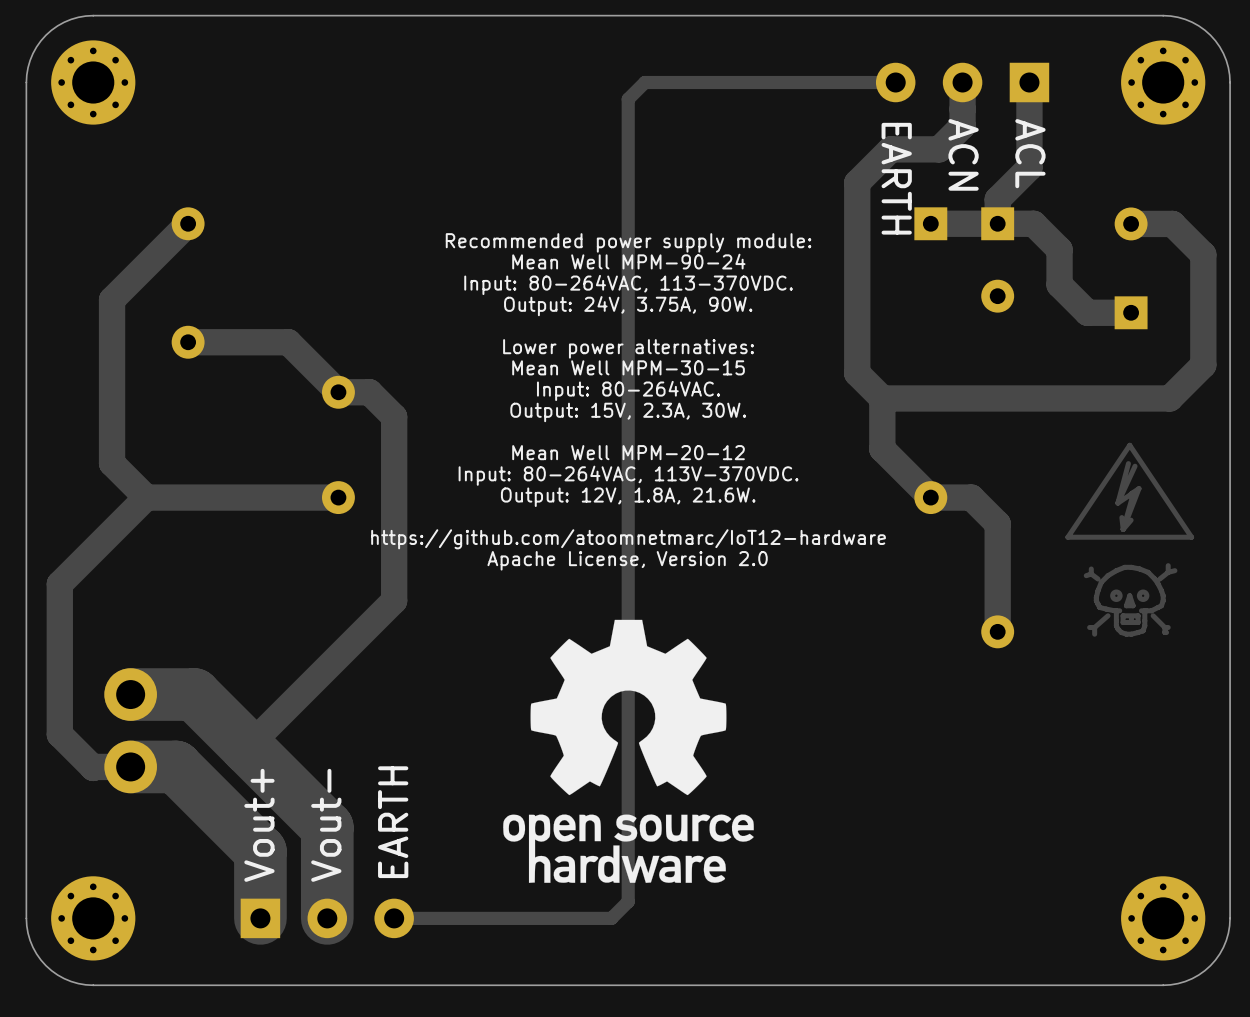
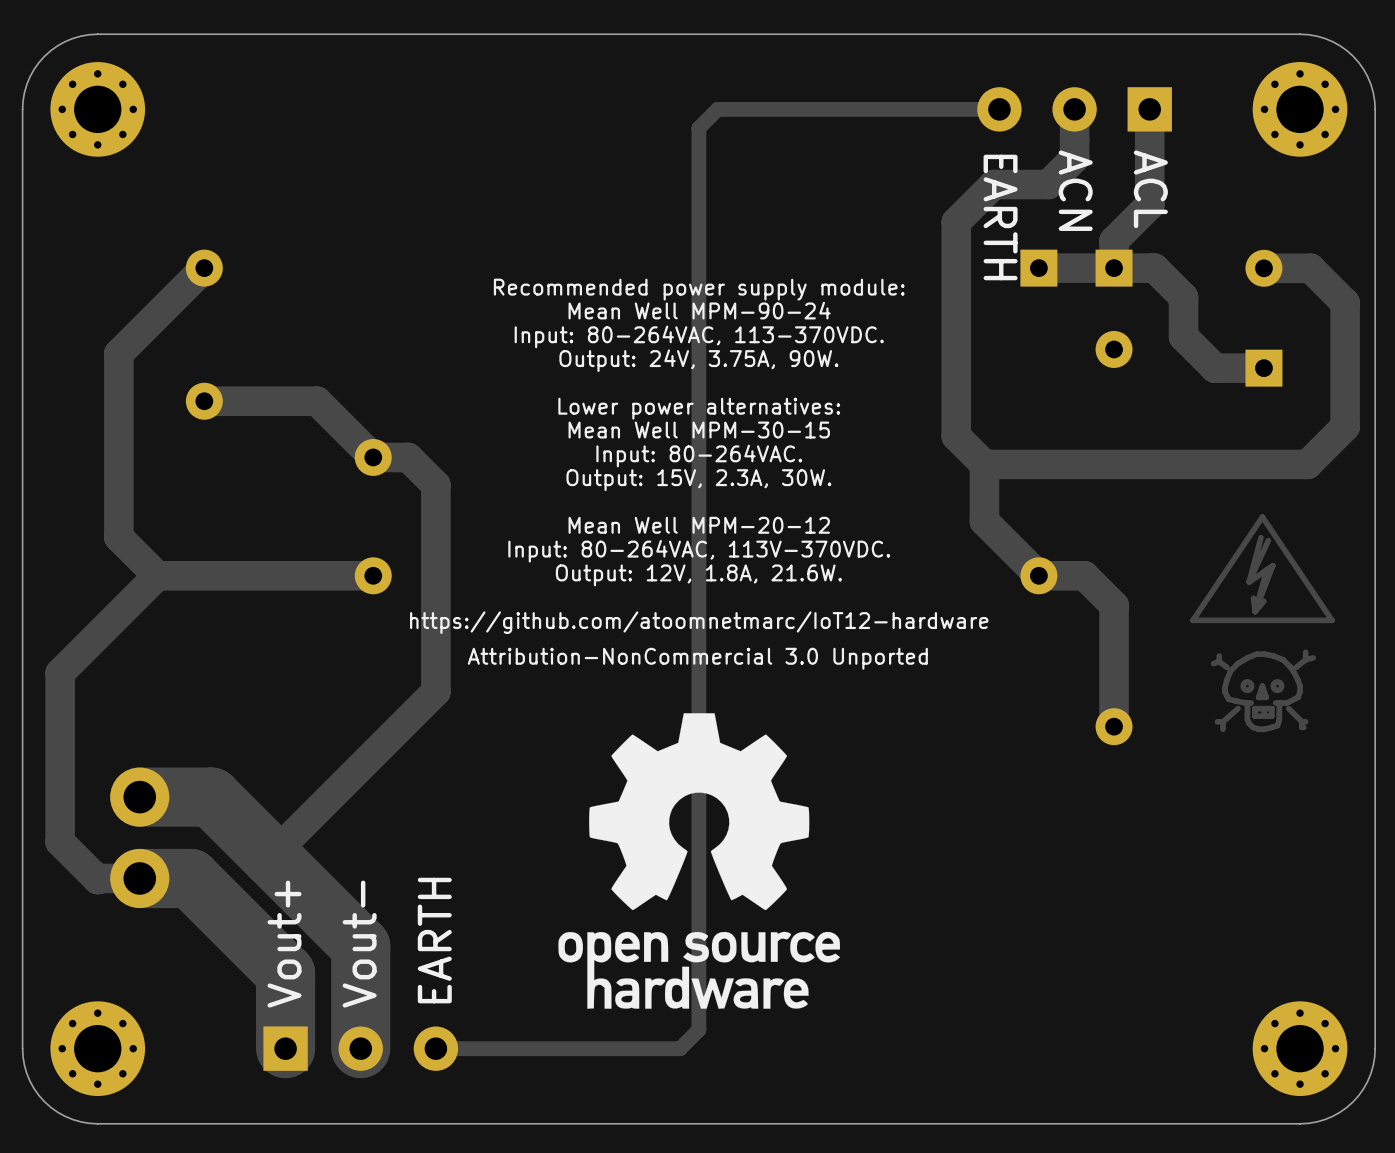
text: Apache License, Version 2.0 (627, 560) -> Attribution-NonCommercial 3.0 Unported (697, 658)

